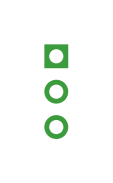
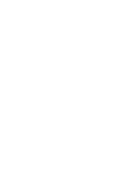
part: (56, 91) -> none

